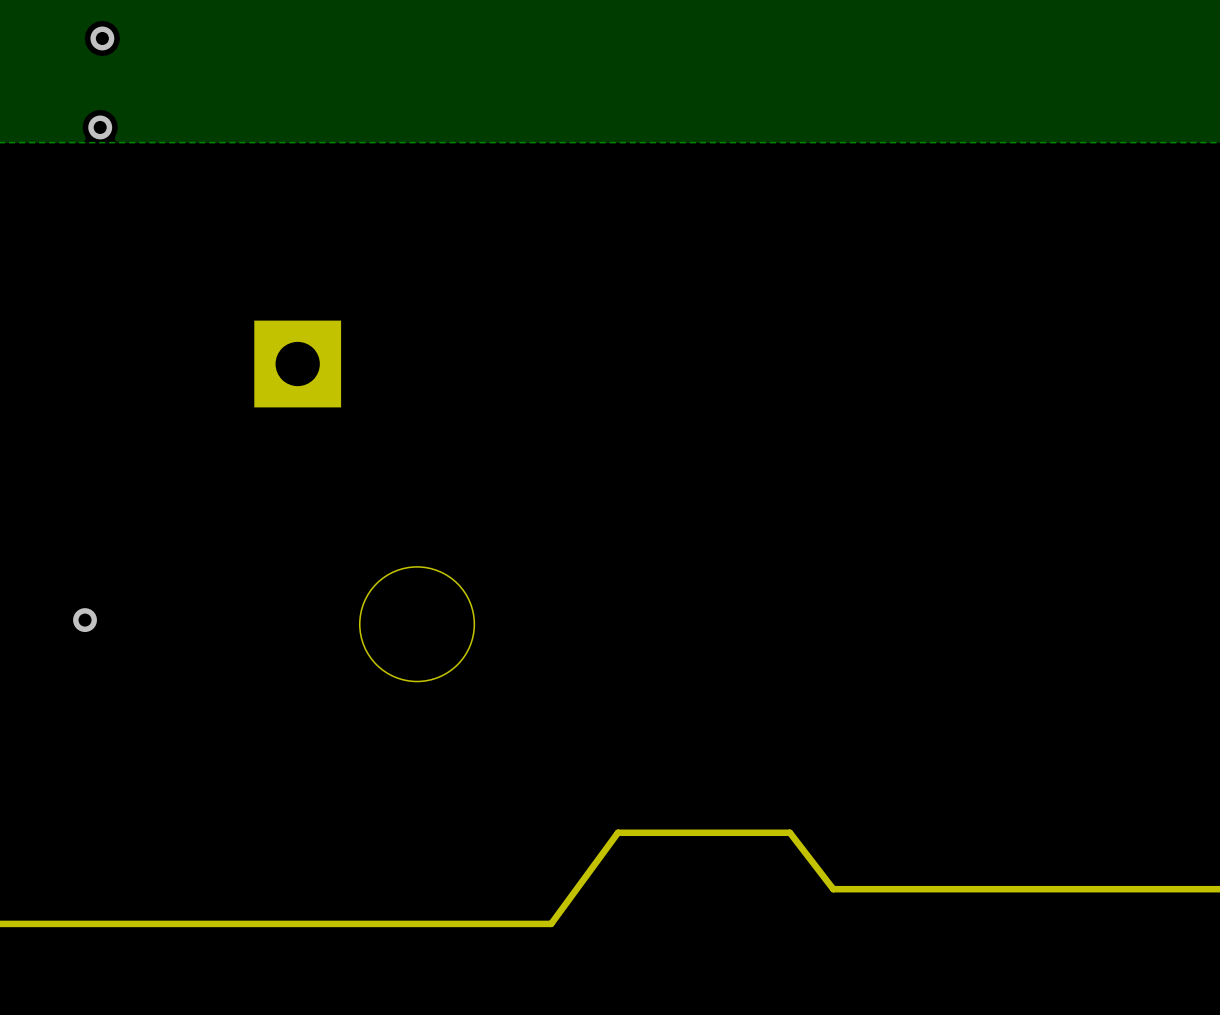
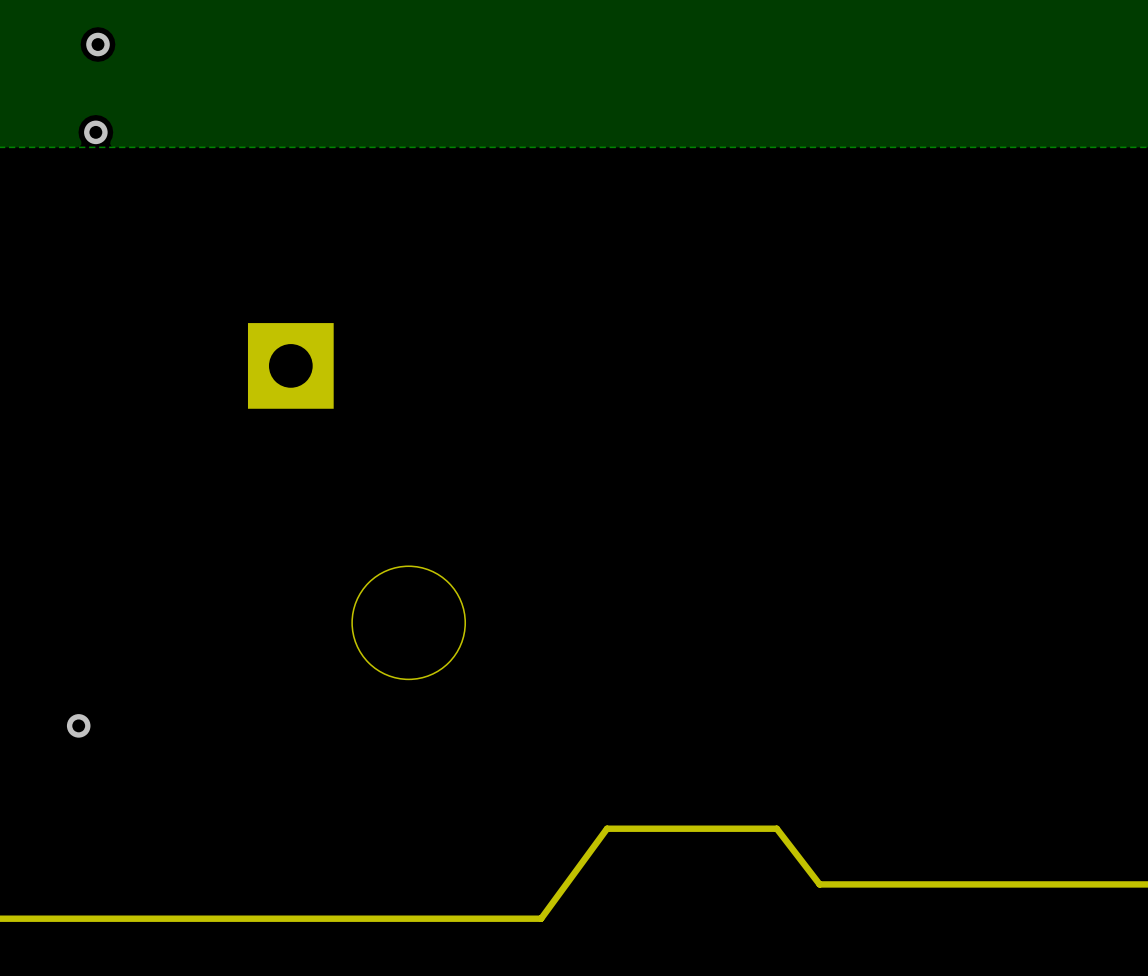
via position: (85, 620) -> (78, 725)

